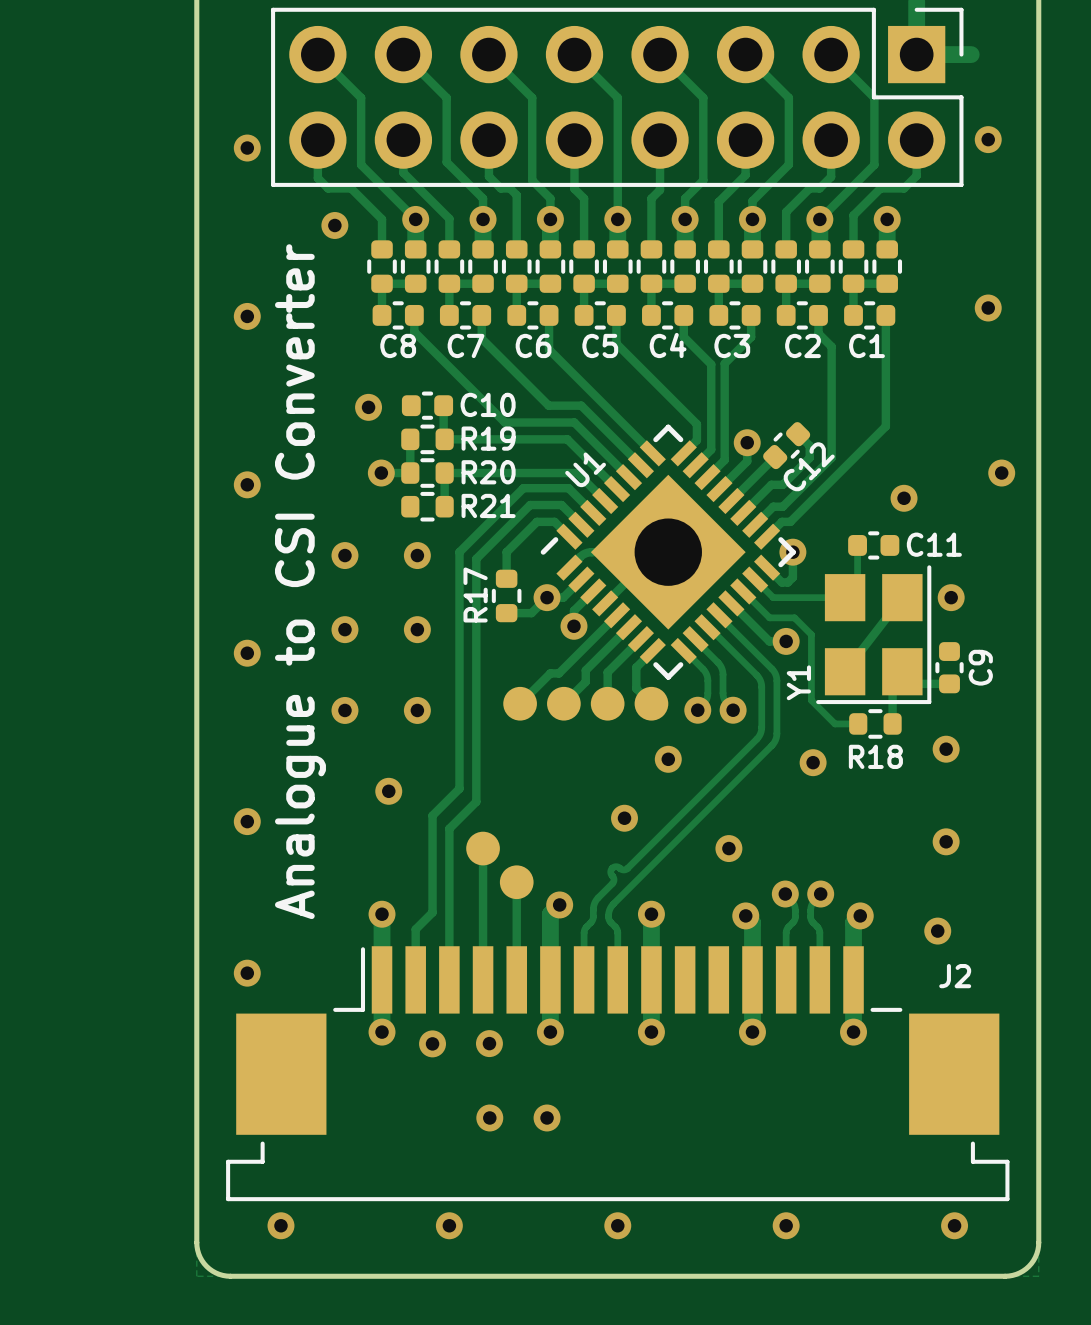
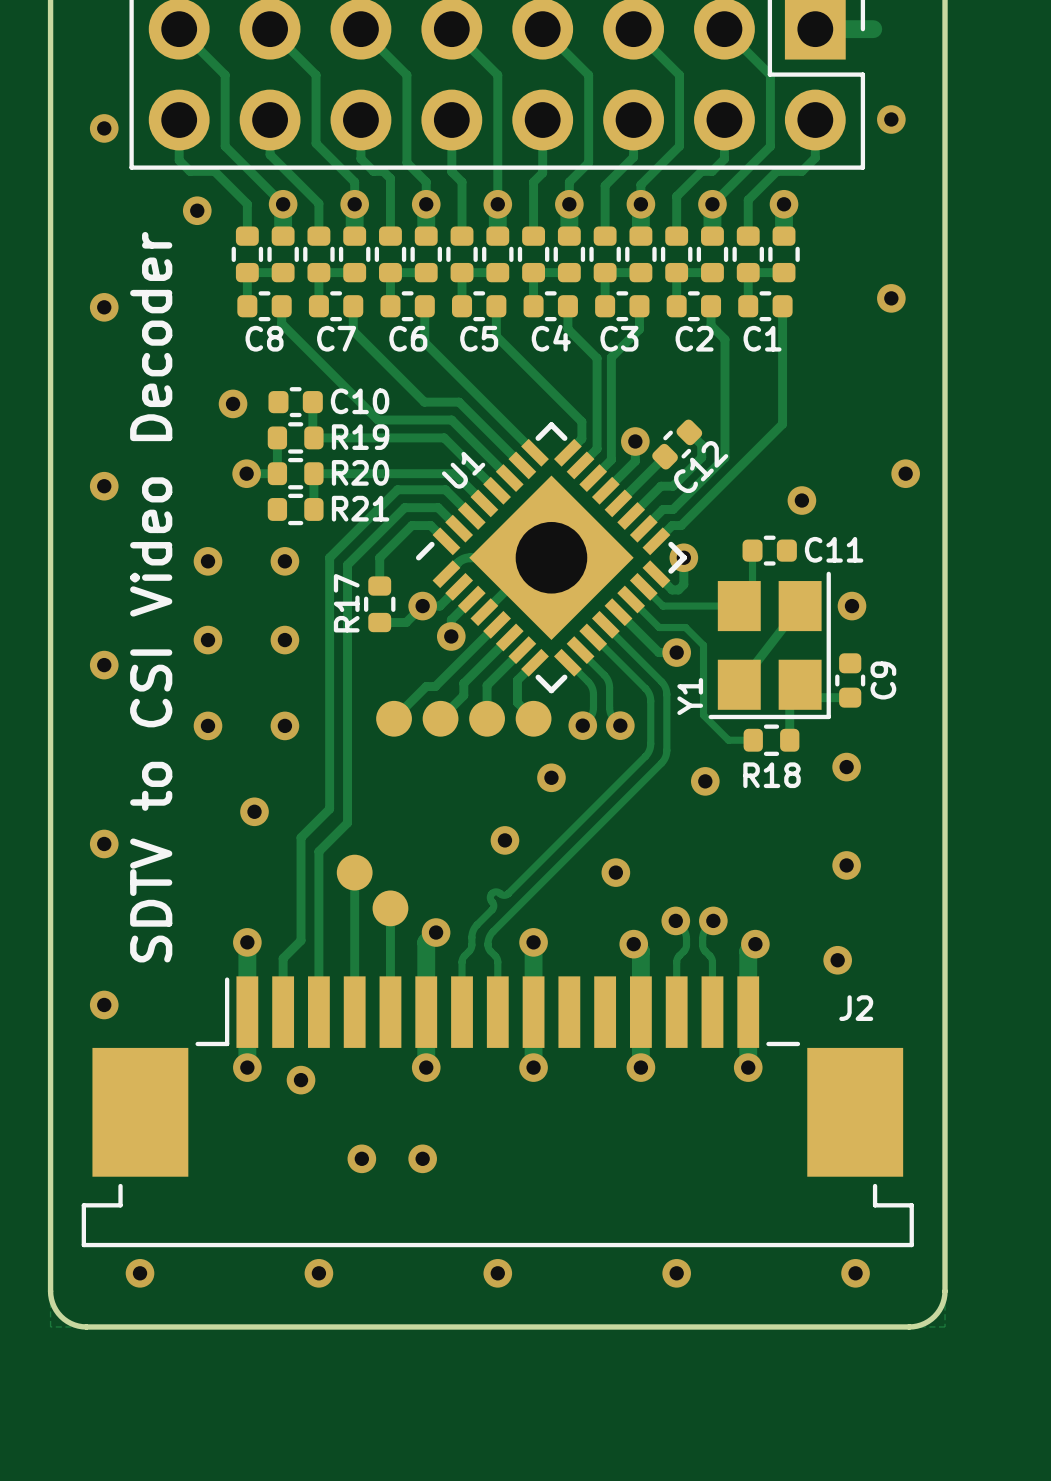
text: Analogue to CSI Converter (300, 581) -> SDTV to CSI Video Decoder (151, 597)
via: (489, 1043) -> none

